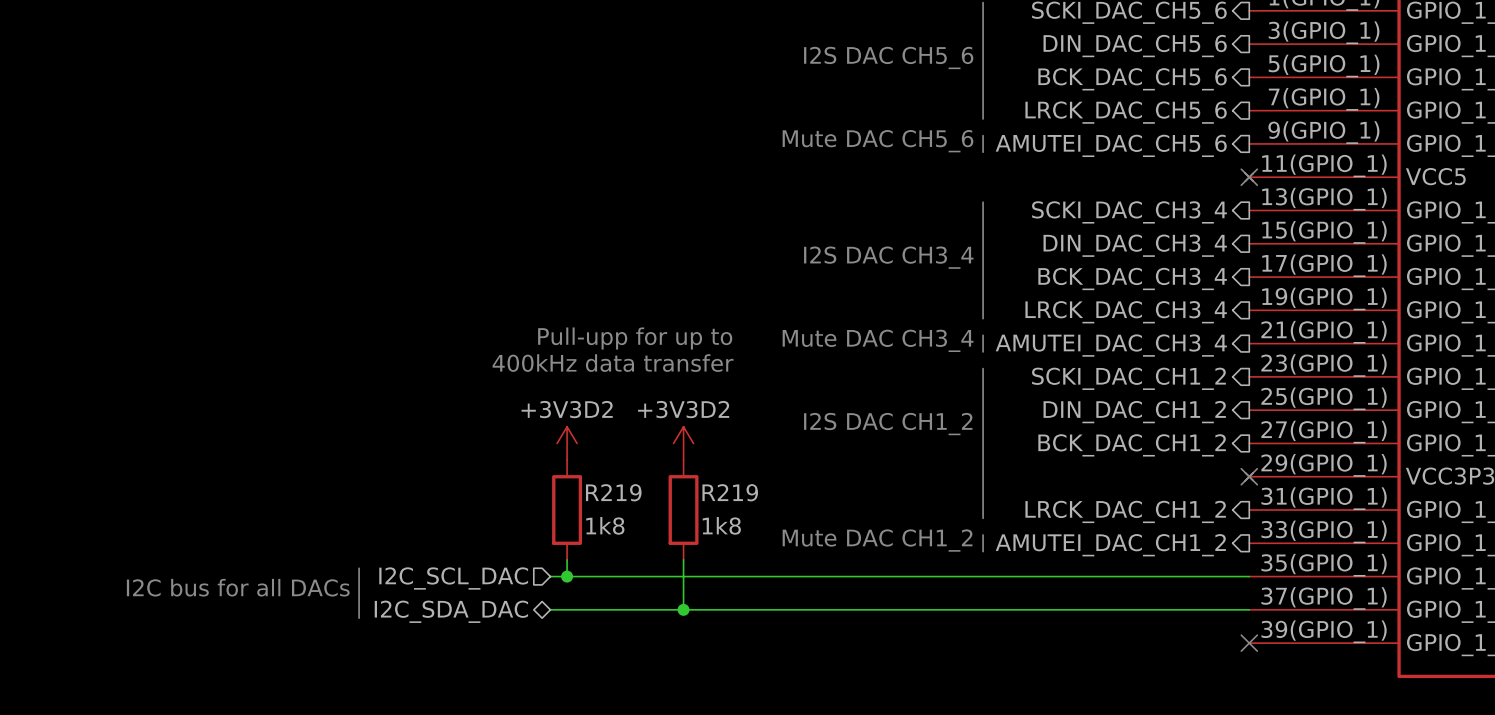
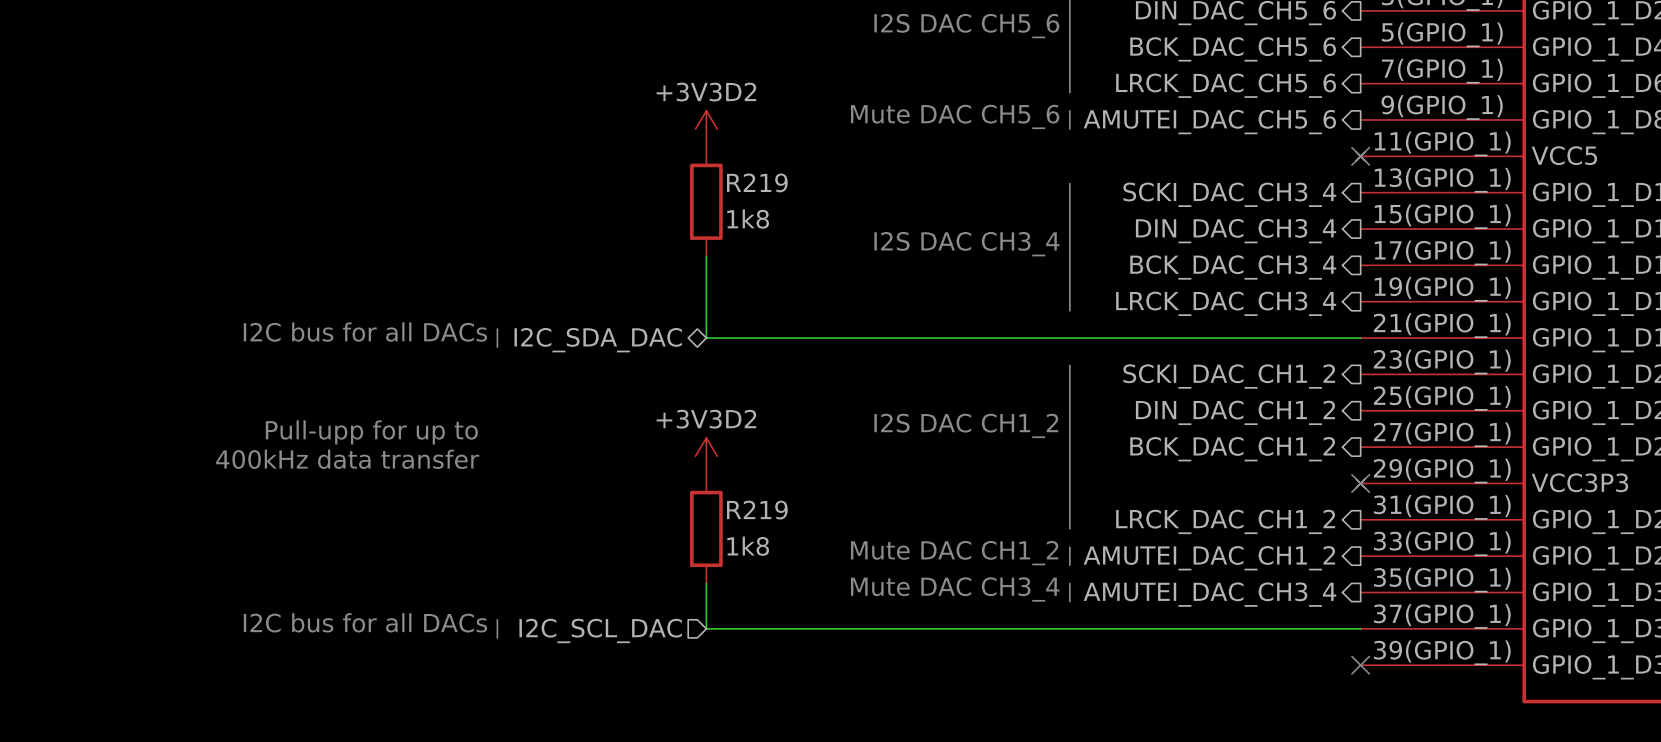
power symbol: none -> +3V3D2 (706, 129)
R219: none -> 1k8 (706, 201)
wire: none -> (706, 256) (706, 338) (1360, 338)
line: none -> (497, 328) (497, 347)
line: (983, 335) (983, 351) -> (1069, 583) (1069, 601)
text: none -> I2C bus for all DACs (365, 332)
text position: Pull-upp for up to (635, 338) -> Pull-upp for up to (371, 432)
text position: Mute DAC CH3_4 (878, 340) -> Mute DAC CH3_4 (955, 589)
hierarchical label position: AMUTEI_DAC_CH3_4 (1111, 345) -> AMUTEI_DAC_CH3_4 (1209, 594)
text position: 400kHz data transfer (613, 363) -> 400kHz data transfer (347, 459)
power symbol: +3V3D2 (567, 443) -> none
power symbol position: +3V3D2 (683, 443) -> +3V3D2 (706, 456)
R219: 1k8 (567, 510) -> none
R219 position: (683, 510) -> (706, 528)
wire: (567, 559) (567, 576) -> none
wire: (683, 559) (683, 609) -> none
line: (359, 568) (359, 618) -> none
wire: (550, 576) (1249, 576) -> none
junction: (567, 576) -> none
hierarchical label position: I2C_SCL_DAC (453, 578) -> I2C_SCL_DAC (600, 630)
text position: I2C bus for all DACs (238, 587) -> I2C bus for all DACs (365, 622)
line: none -> (497, 619) (497, 637)
wire: (550, 609) (650, 609) -> (706, 583) (706, 628)
junction: (683, 609) -> none
hierarchical label position: I2C_SDA_DAC (451, 611) -> I2C_SDA_DAC (598, 340)

